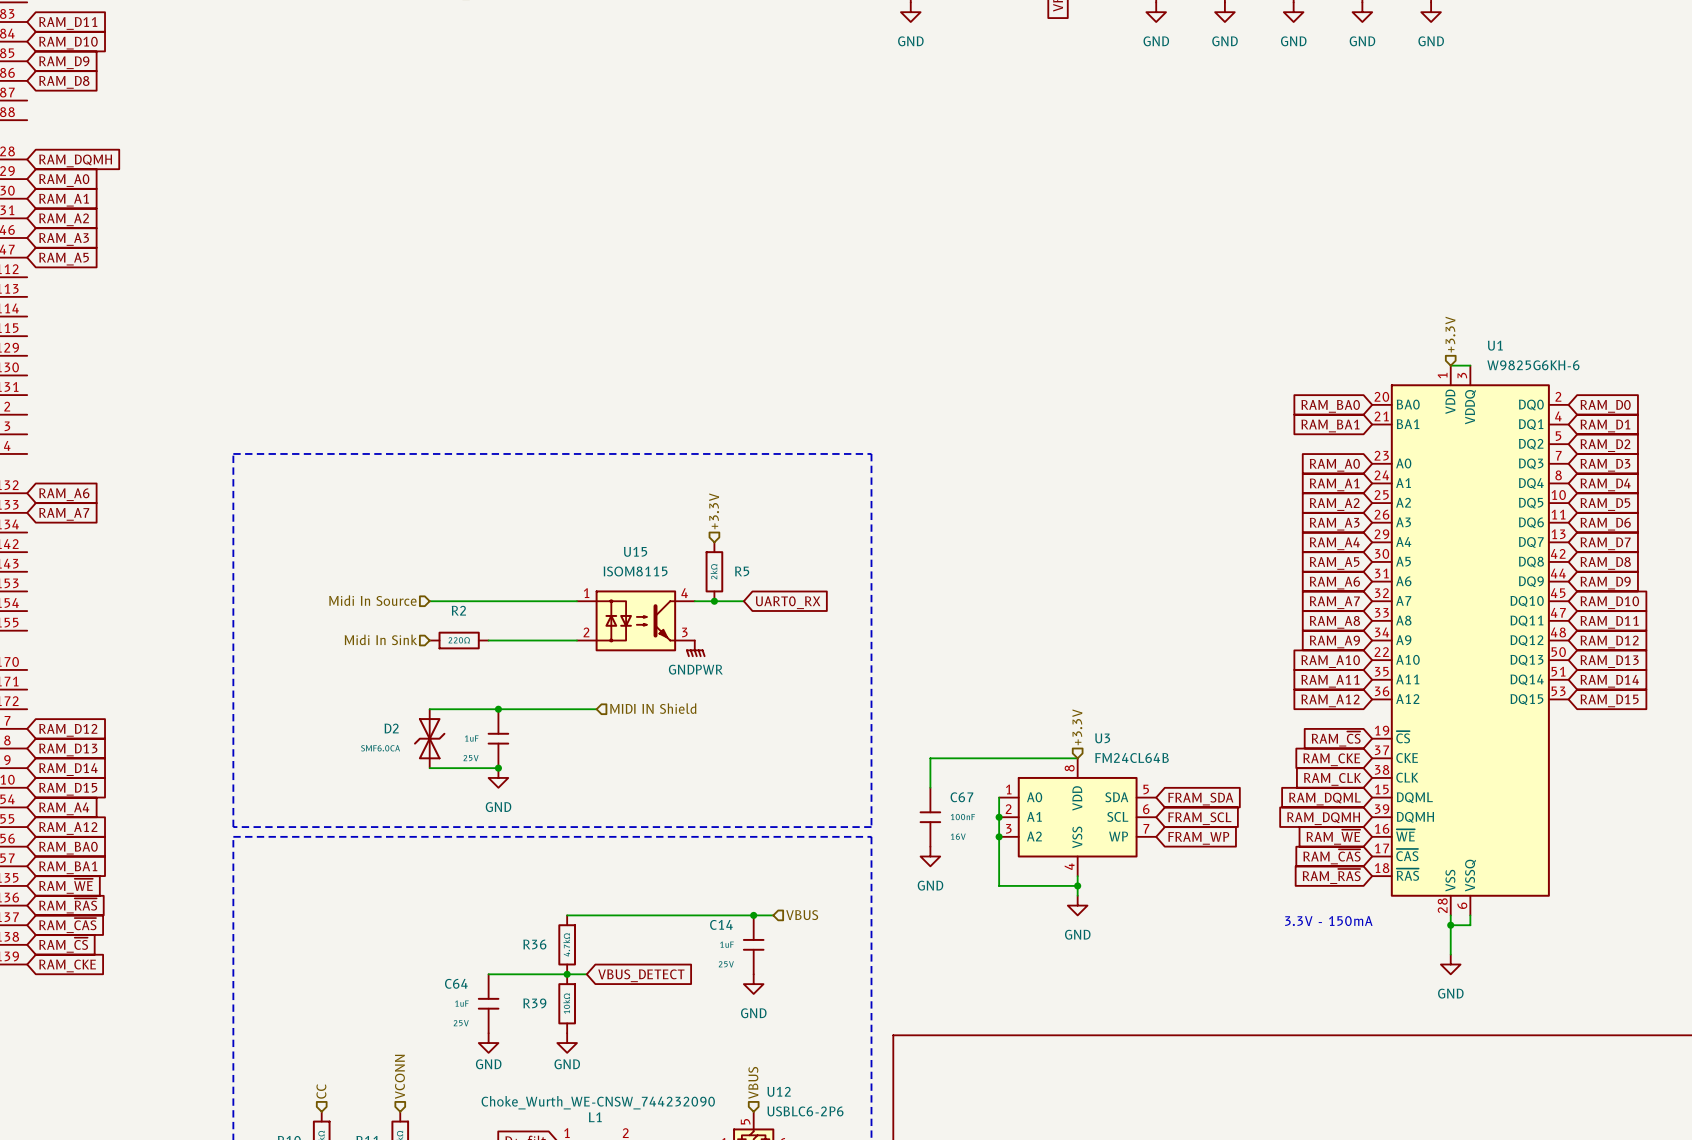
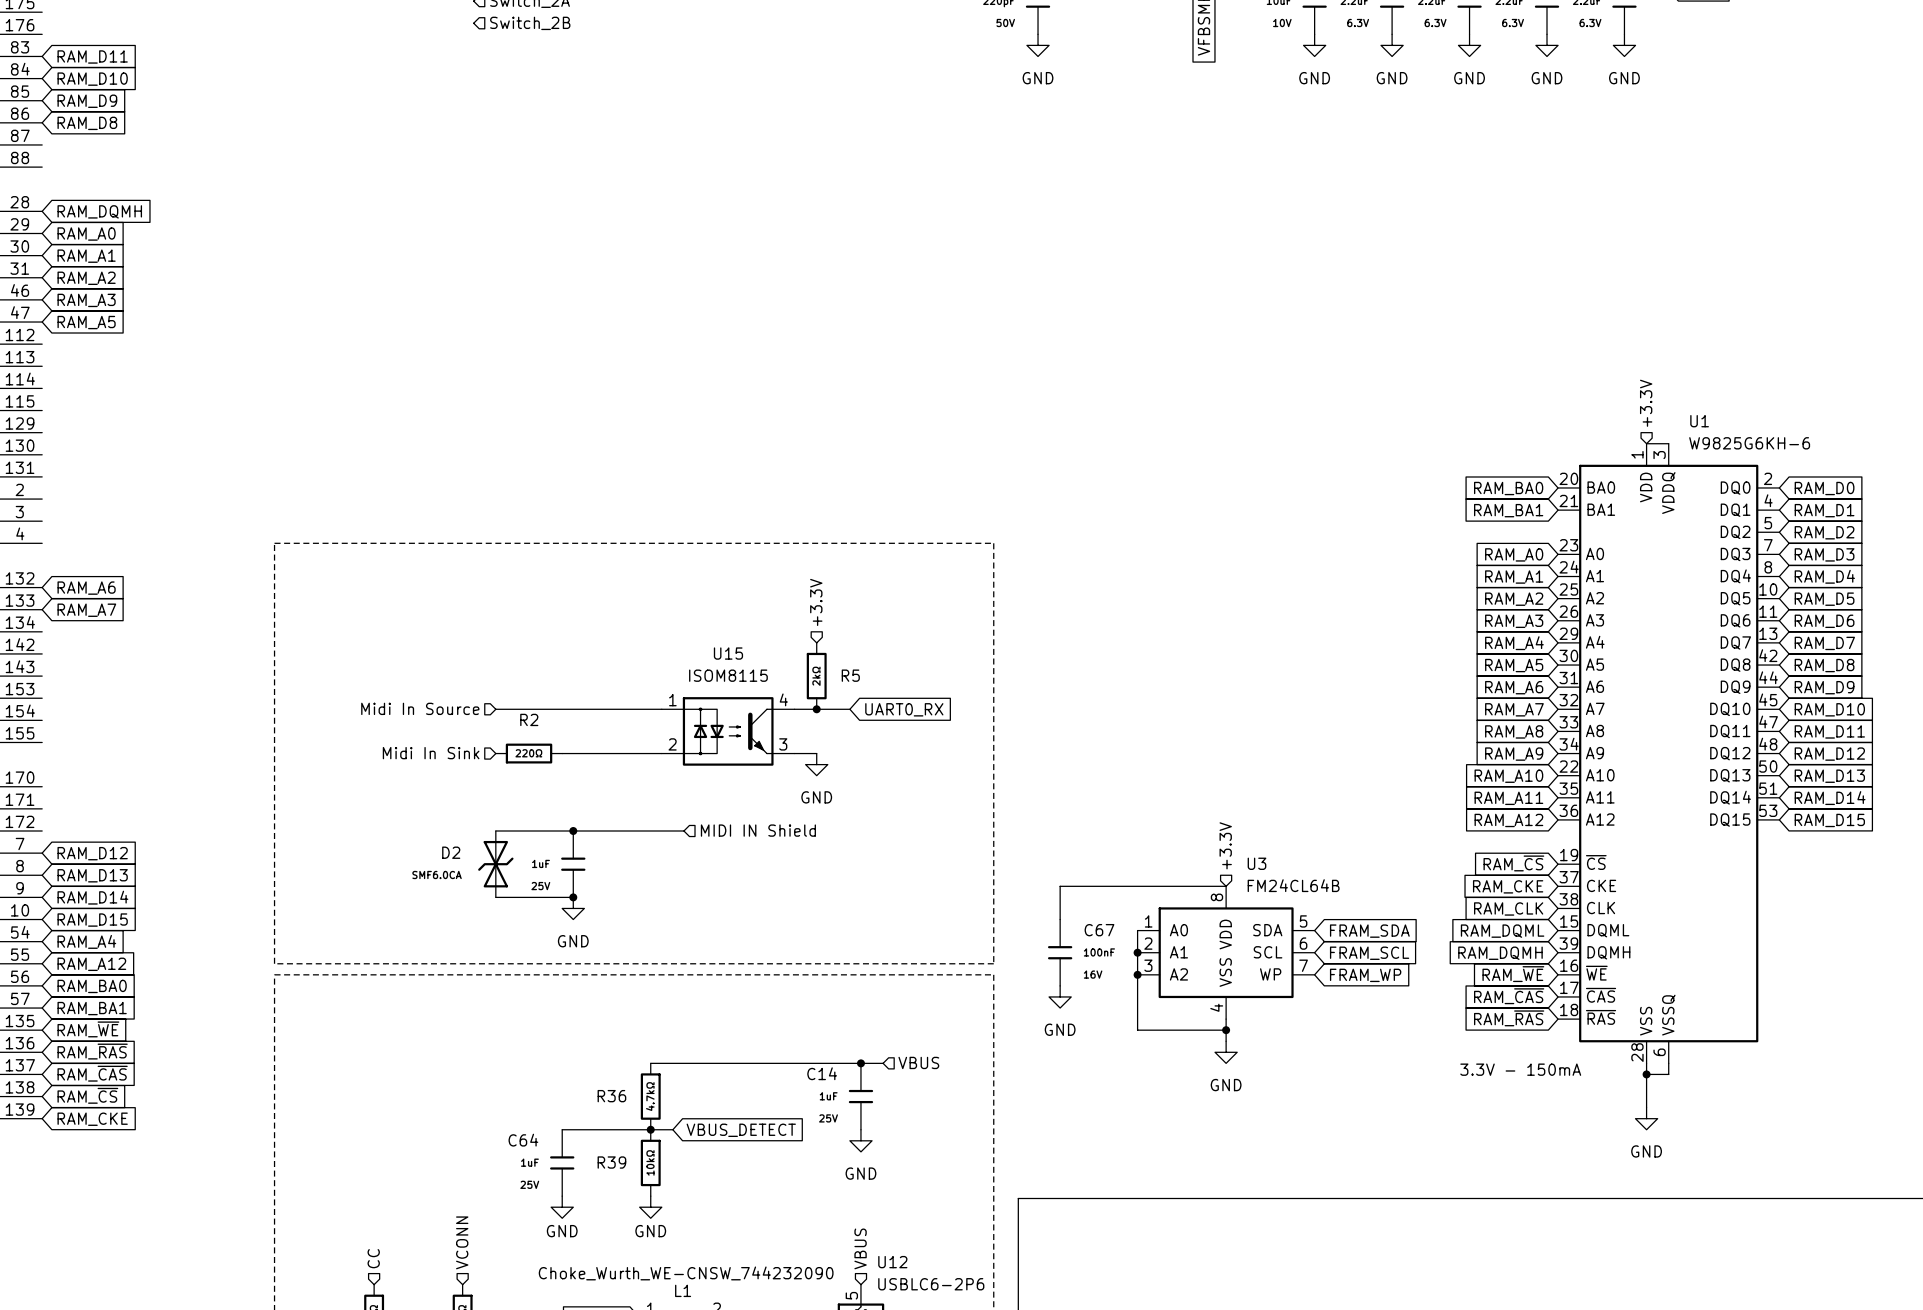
wire: none -> (794, 753) (816, 753)
power symbol: GNDPWR (695, 648) -> none
power symbol: none -> GND (816, 764)

